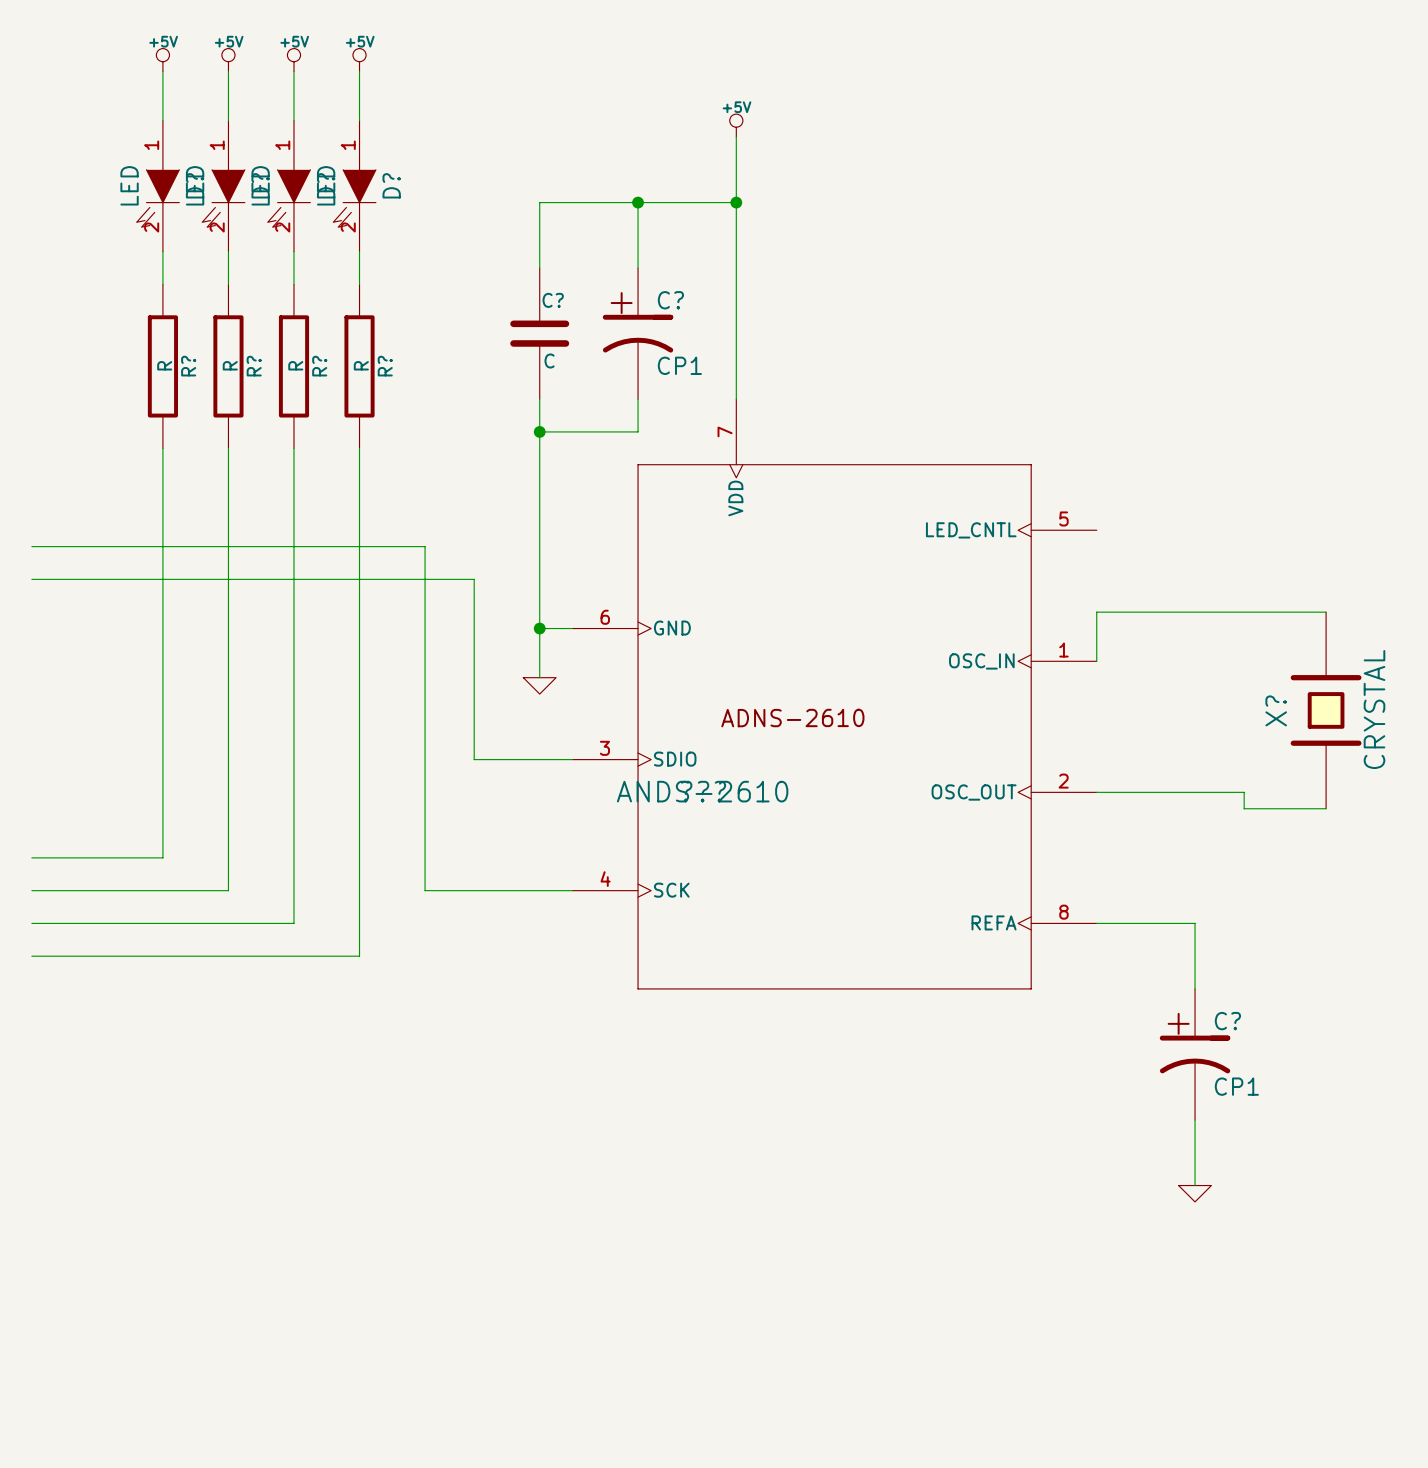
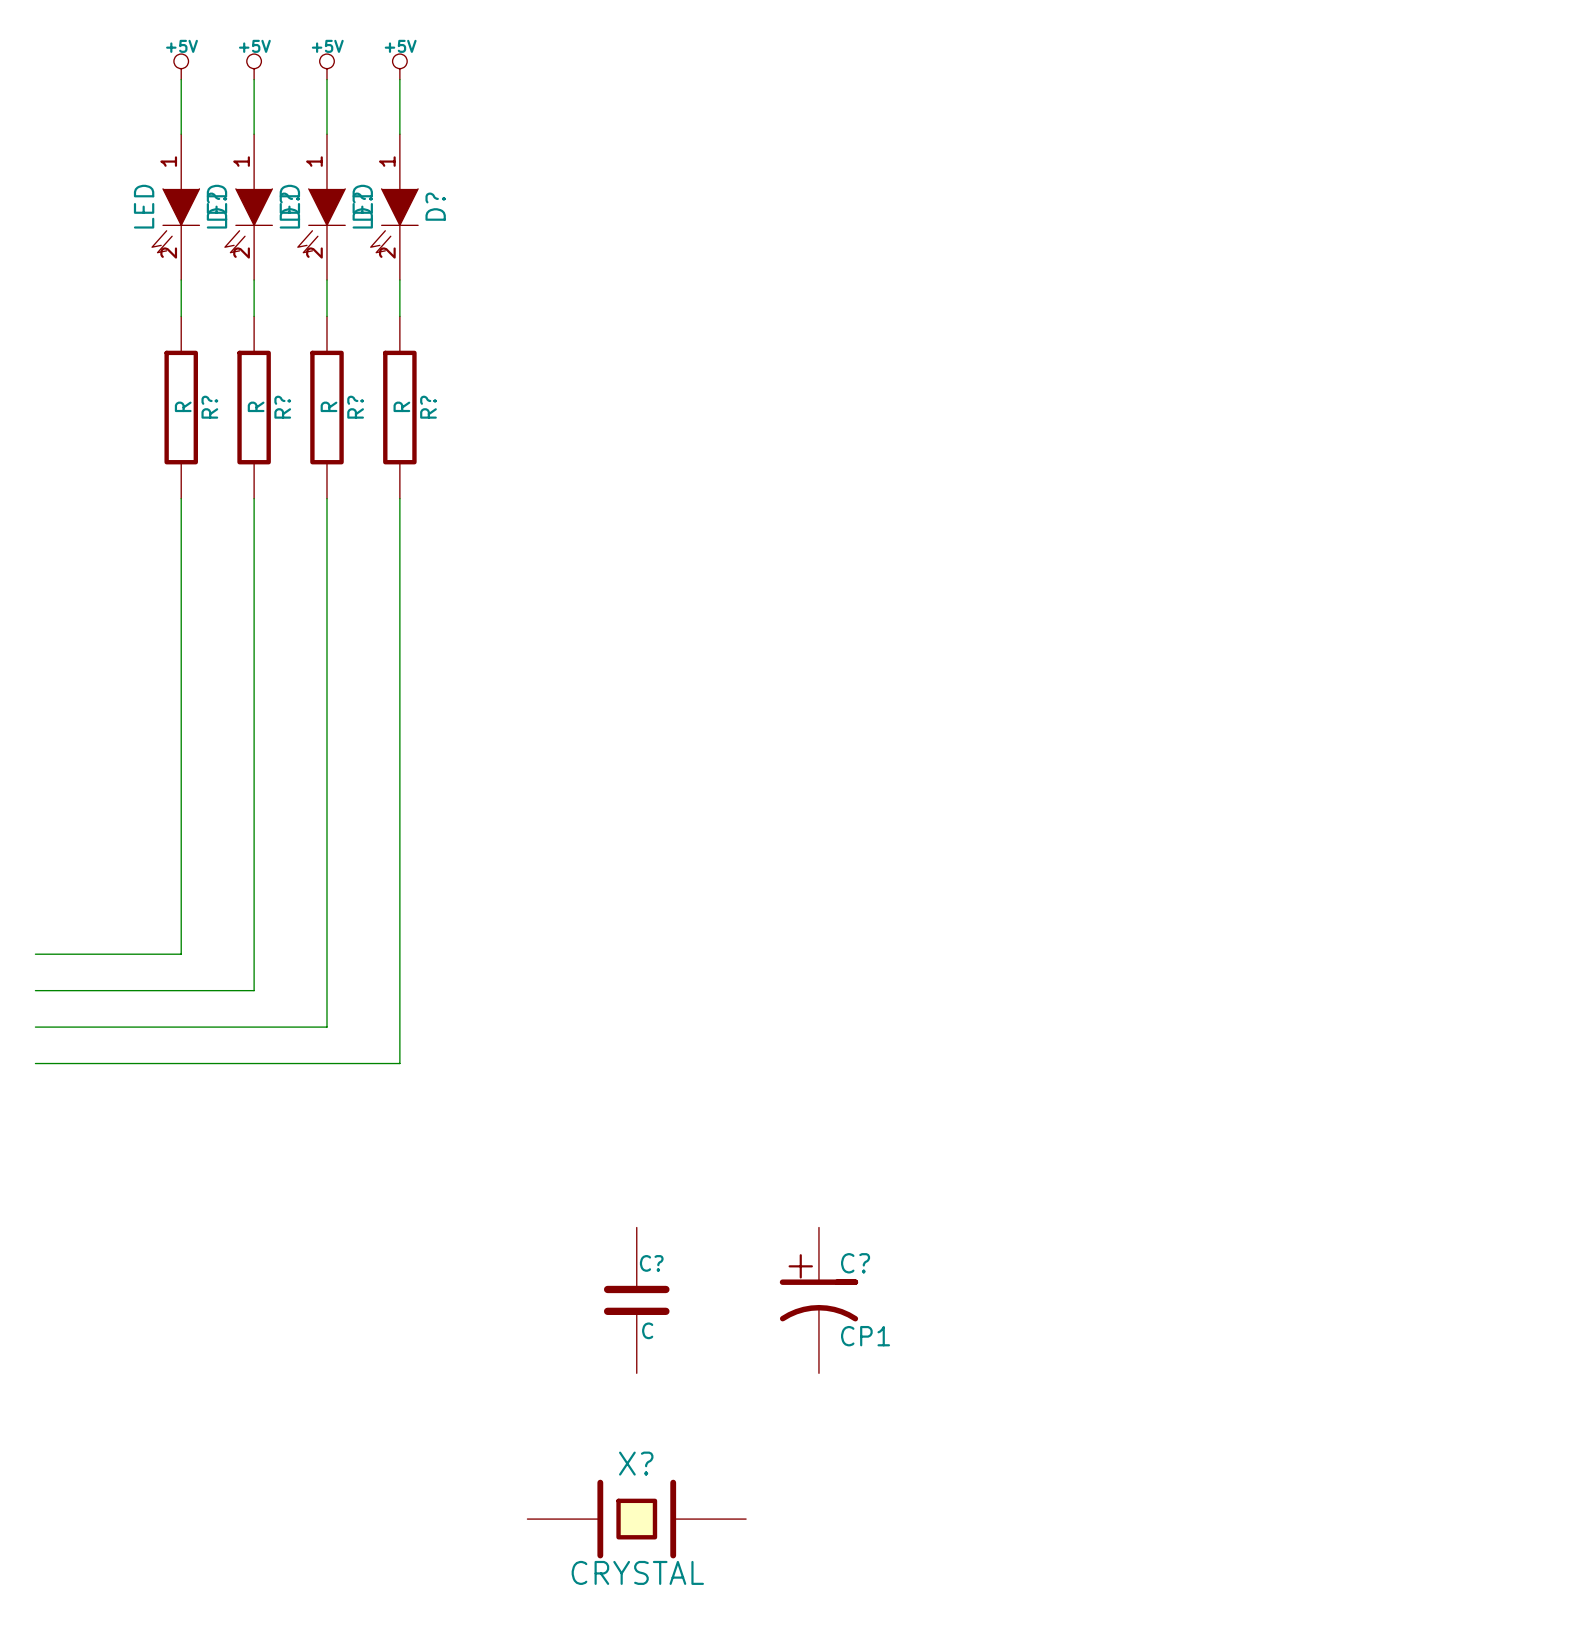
power symbol: +5V (736, 125) -> none
wire: (736, 137) (736, 399) -> none
wire: (638, 202) (638, 268) -> none
junction: (638, 202) -> none
wire: (736, 202) (539, 202) (539, 268) -> none
junction: (736, 202) -> none
C?: C (539, 333) -> none
C?: CP1 (638, 333) -> none
wire: (539, 399) (539, 677) -> none
wire: (638, 399) (638, 431) (539, 431) -> none
junction: (539, 431) -> none
wire: (31, 546) (425, 546) (425, 890) (572, 890) -> none
wire: (31, 579) (474, 579) (474, 759) (572, 759) -> none
wire: (1326, 612) (1096, 612) (1096, 661) -> none
wire: (539, 628) (572, 628) -> none
junction: (539, 628) -> none
power symbol: (539, 685) -> none
part: ANDS-2610 (834, 694) -> none
X?: CRYSTAL (1326, 710) -> none
wire: (1096, 792) (1244, 792) (1244, 808) (1326, 808) -> none
wire: (1096, 923) (1195, 923) (1195, 988) -> none
C?: CP1 (1195, 1054) -> none
wire: (1195, 1120) (1195, 1185) -> none
C?: none -> C (636, 1300)
C?: none -> CP1 (818, 1300)
power symbol: (1195, 1193) -> none
X?: none -> CRYSTAL (636, 1519)

